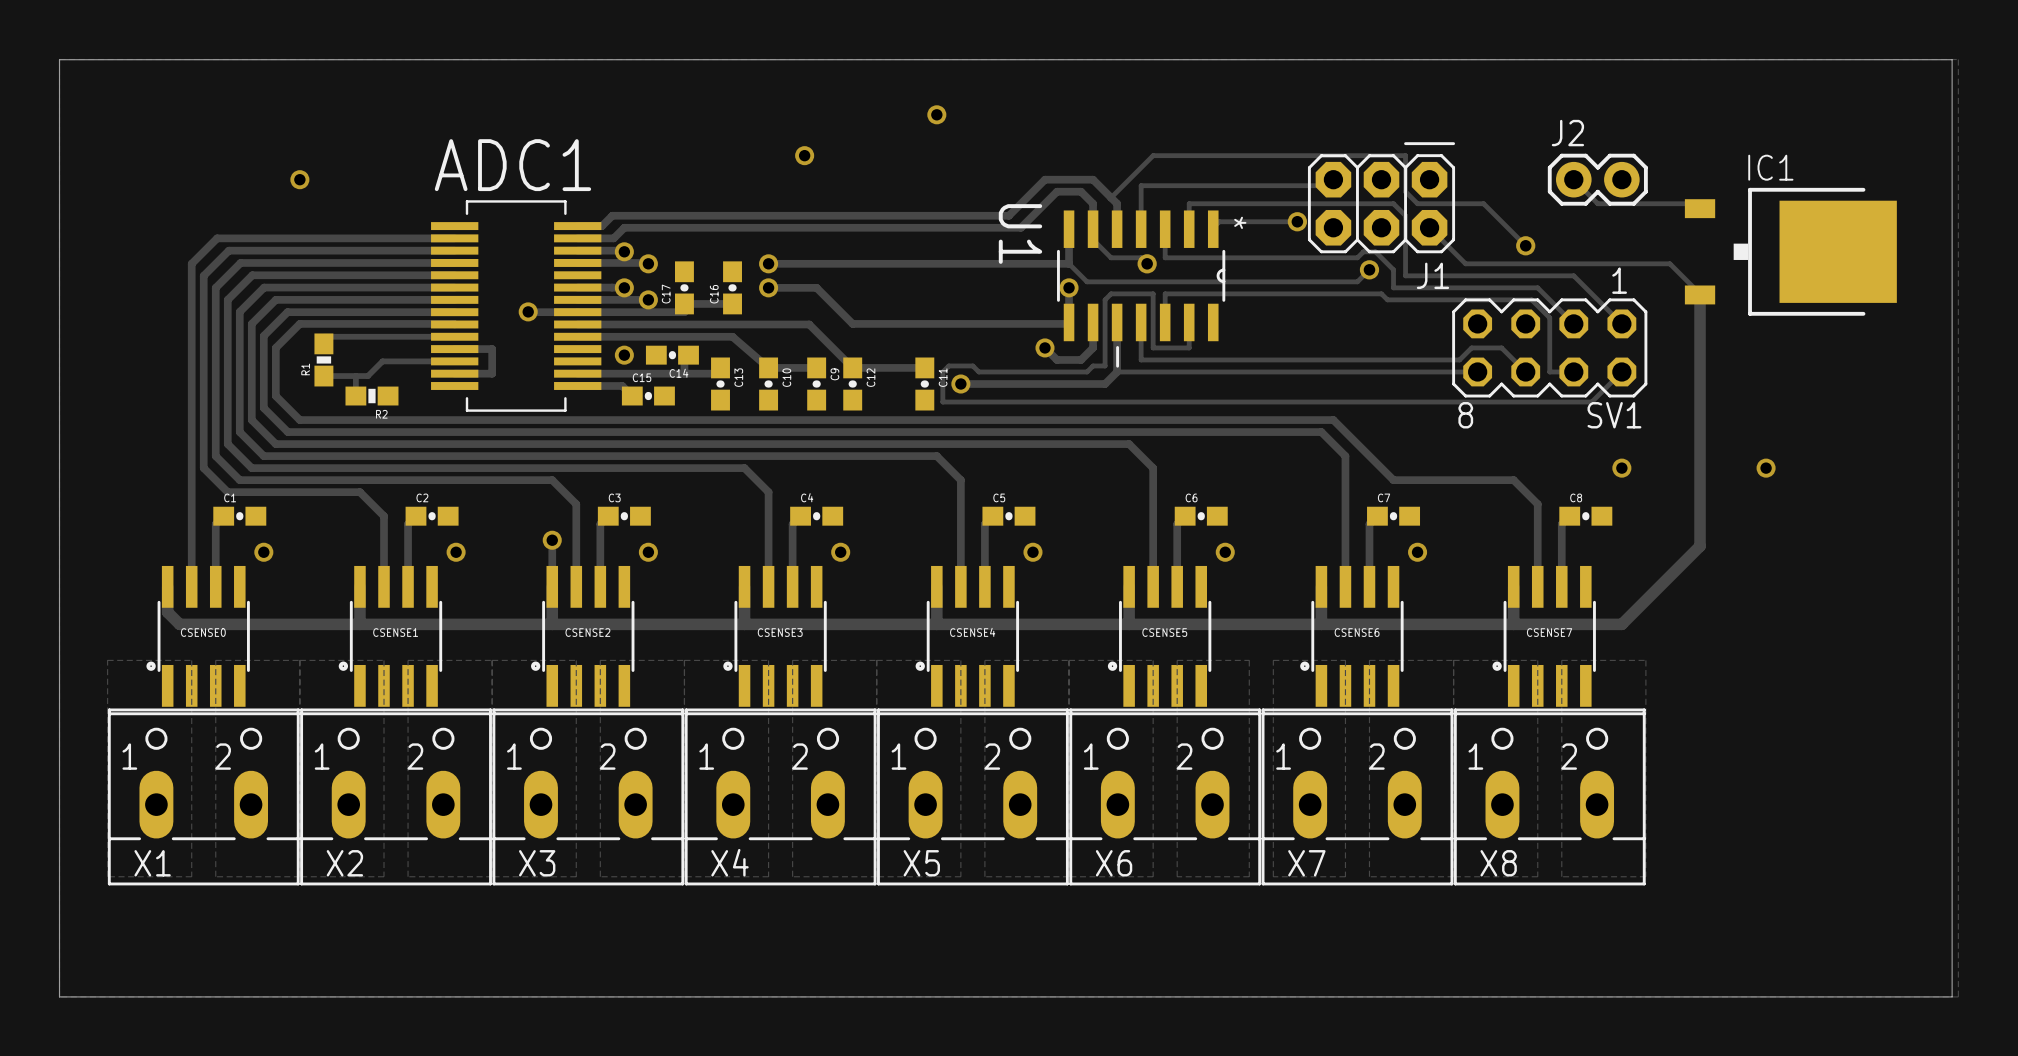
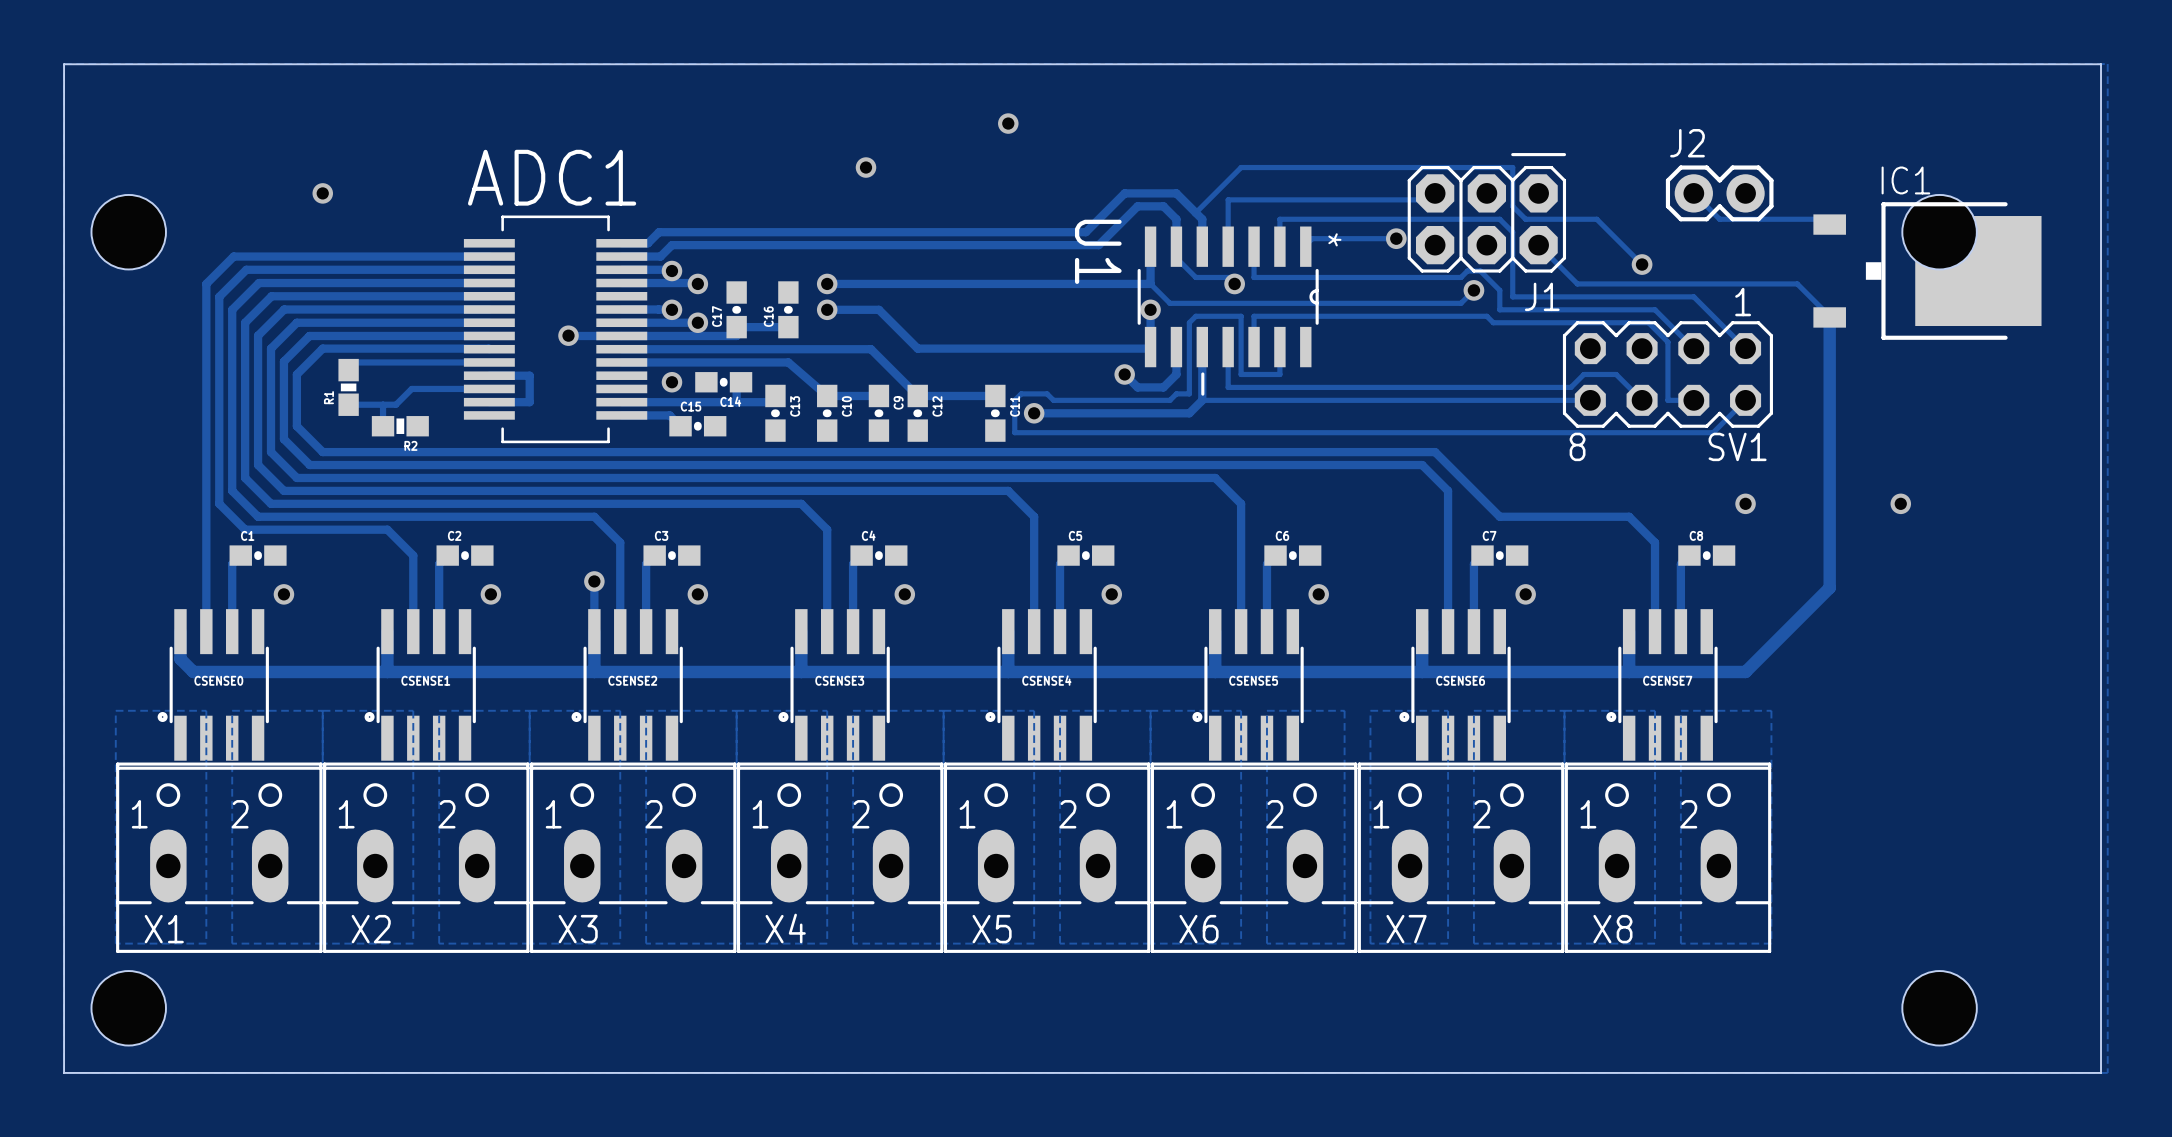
hole: none -> (128, 232)
hole: none -> (1939, 232)
hole: none -> (128, 1008)
hole: none -> (1939, 1008)

